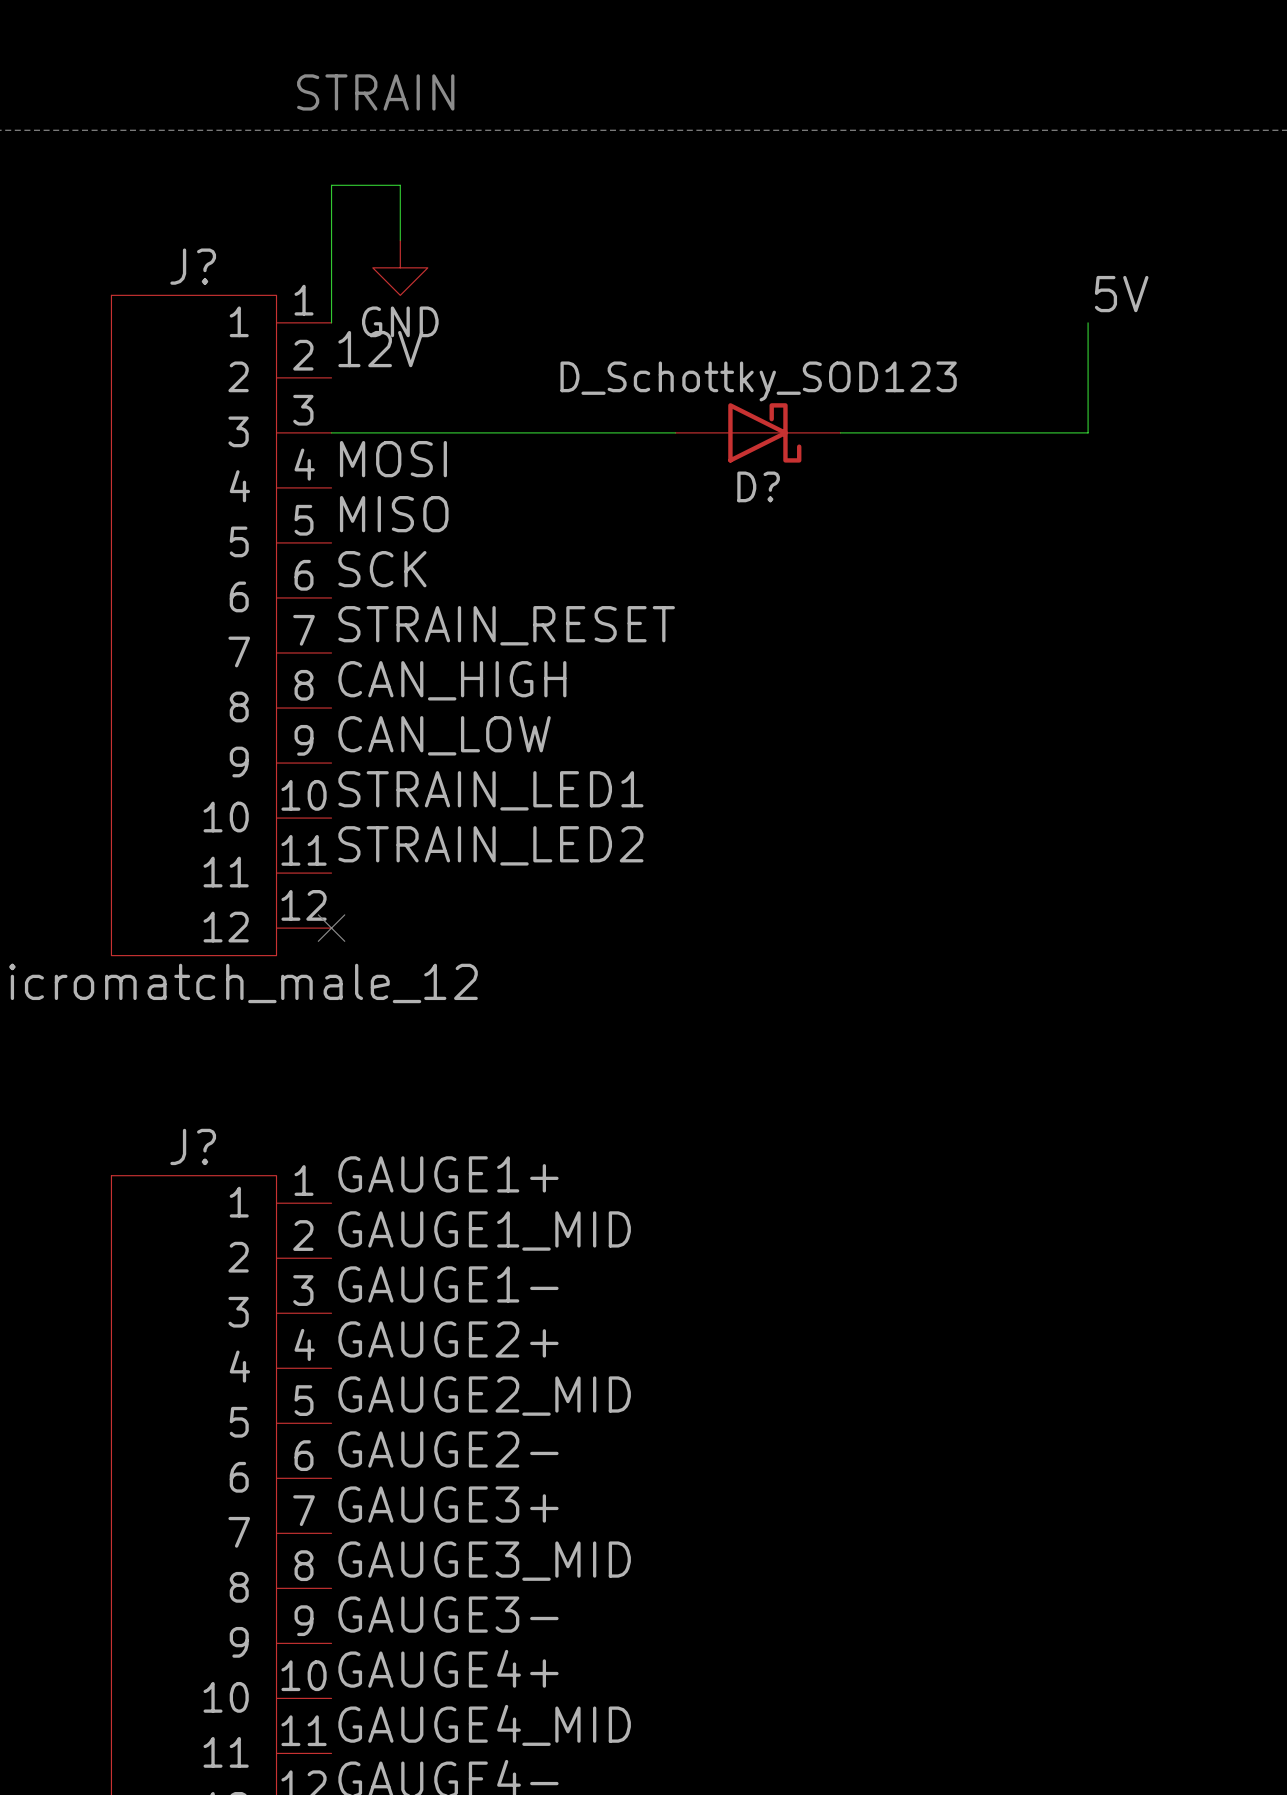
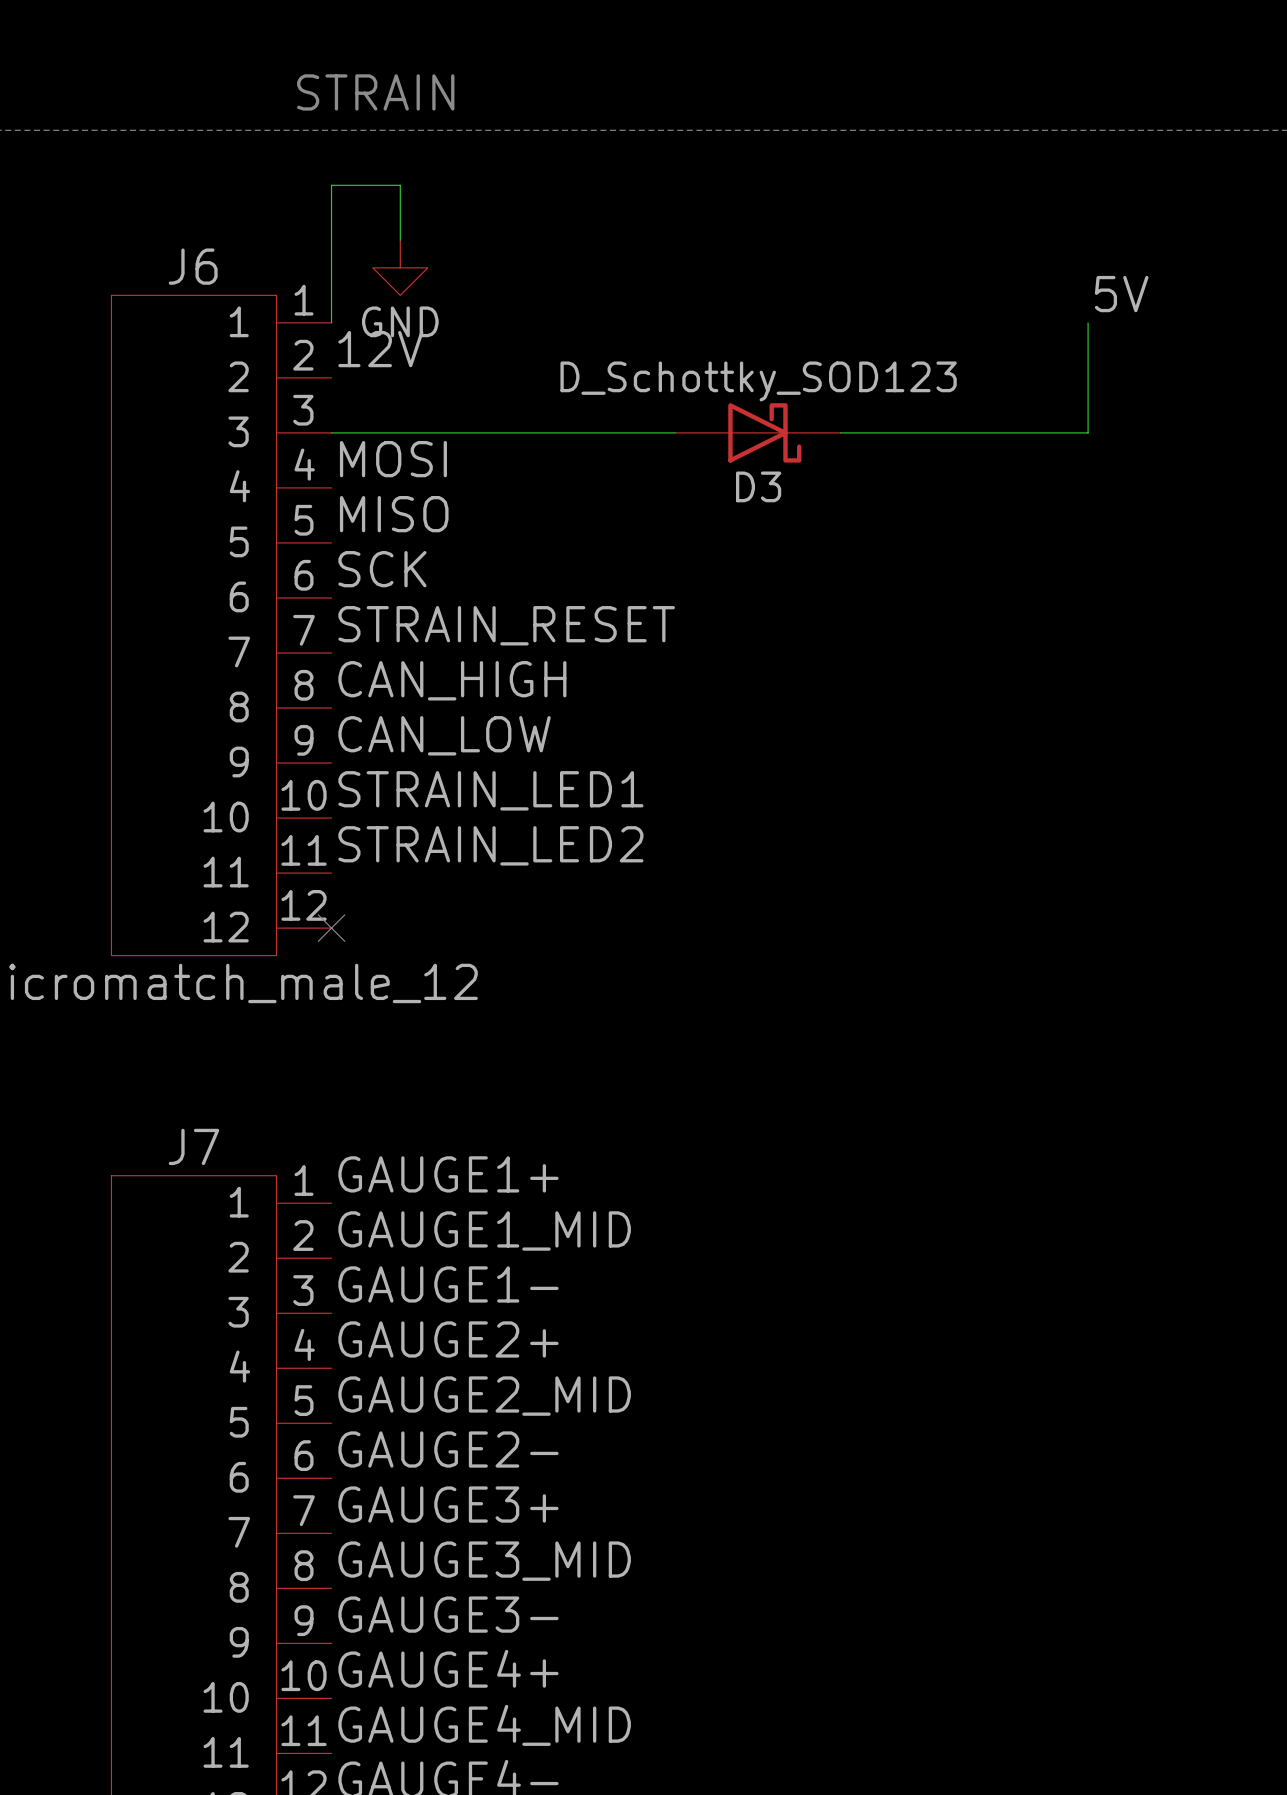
J? name: J? (193, 266) -> J6 (193, 266)
D? name: D? (758, 486) -> D3 (758, 486)
J? name: J? (193, 1146) -> J7 (193, 1146)

